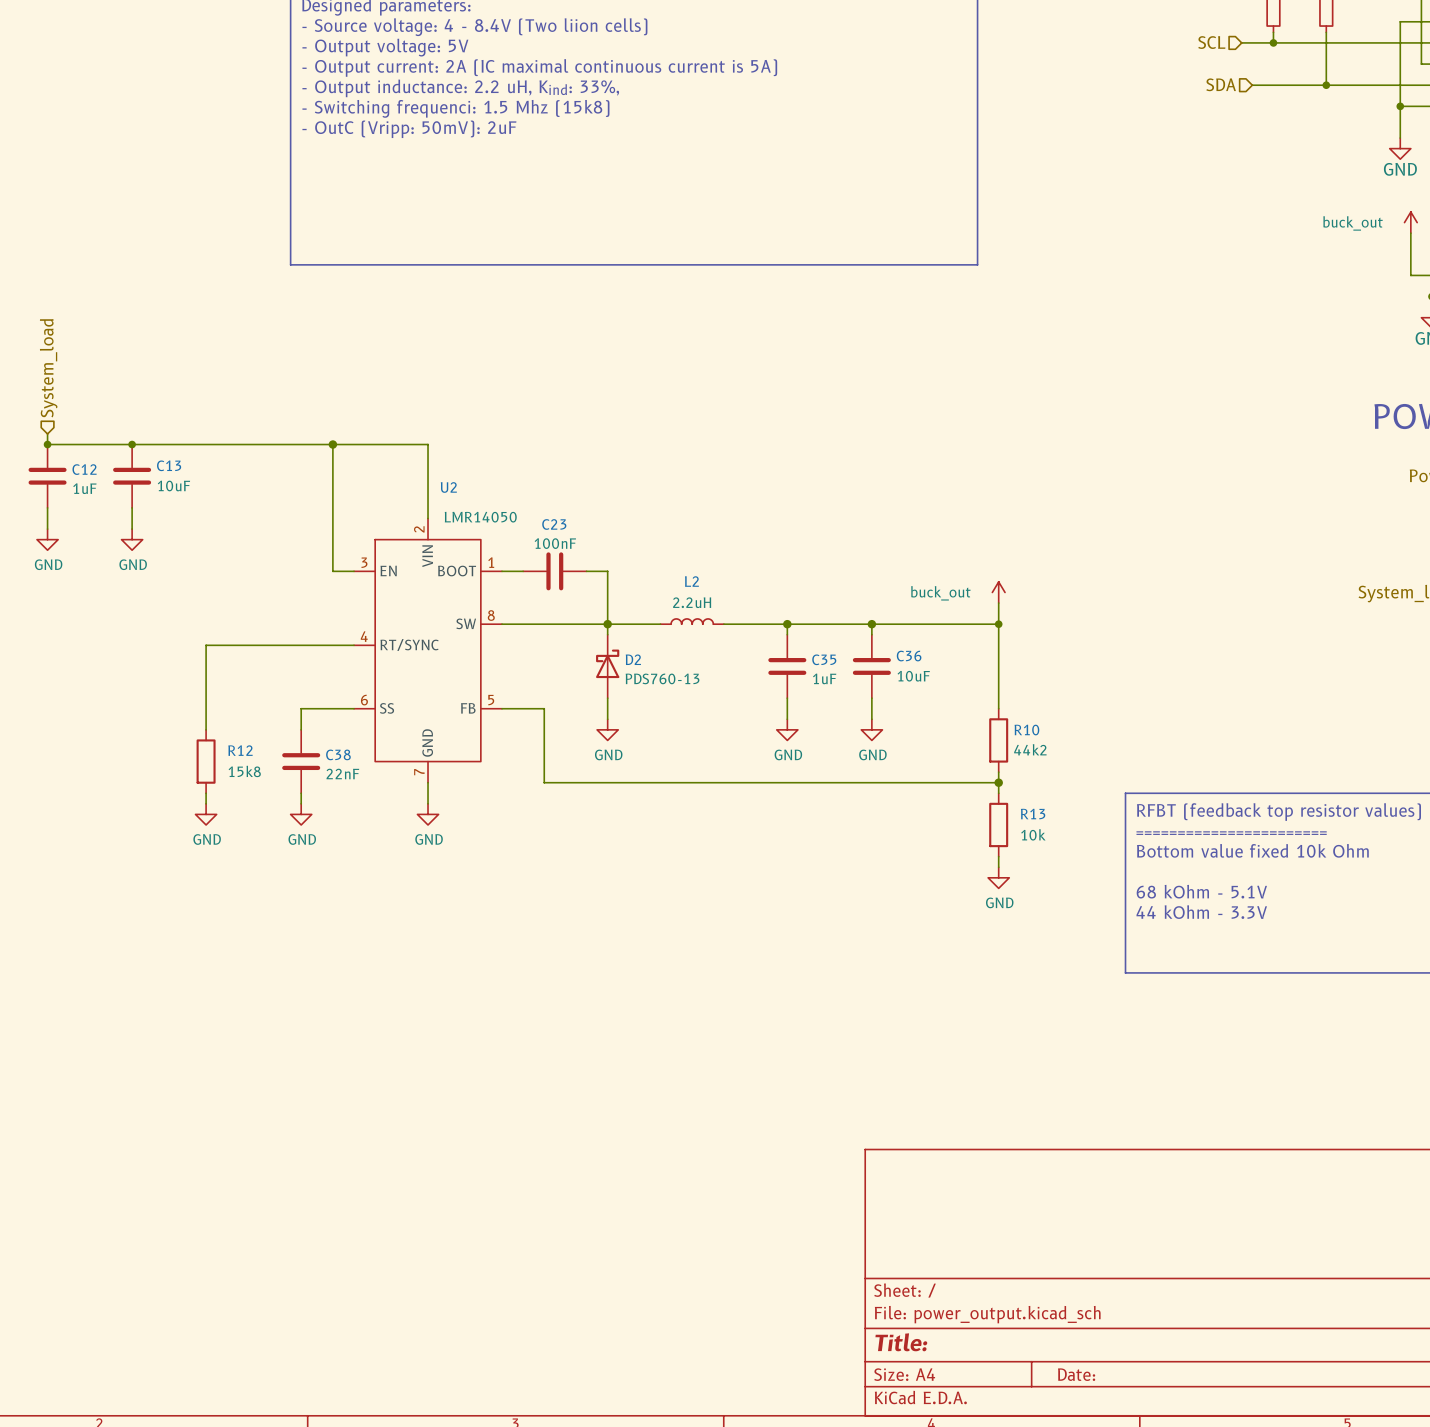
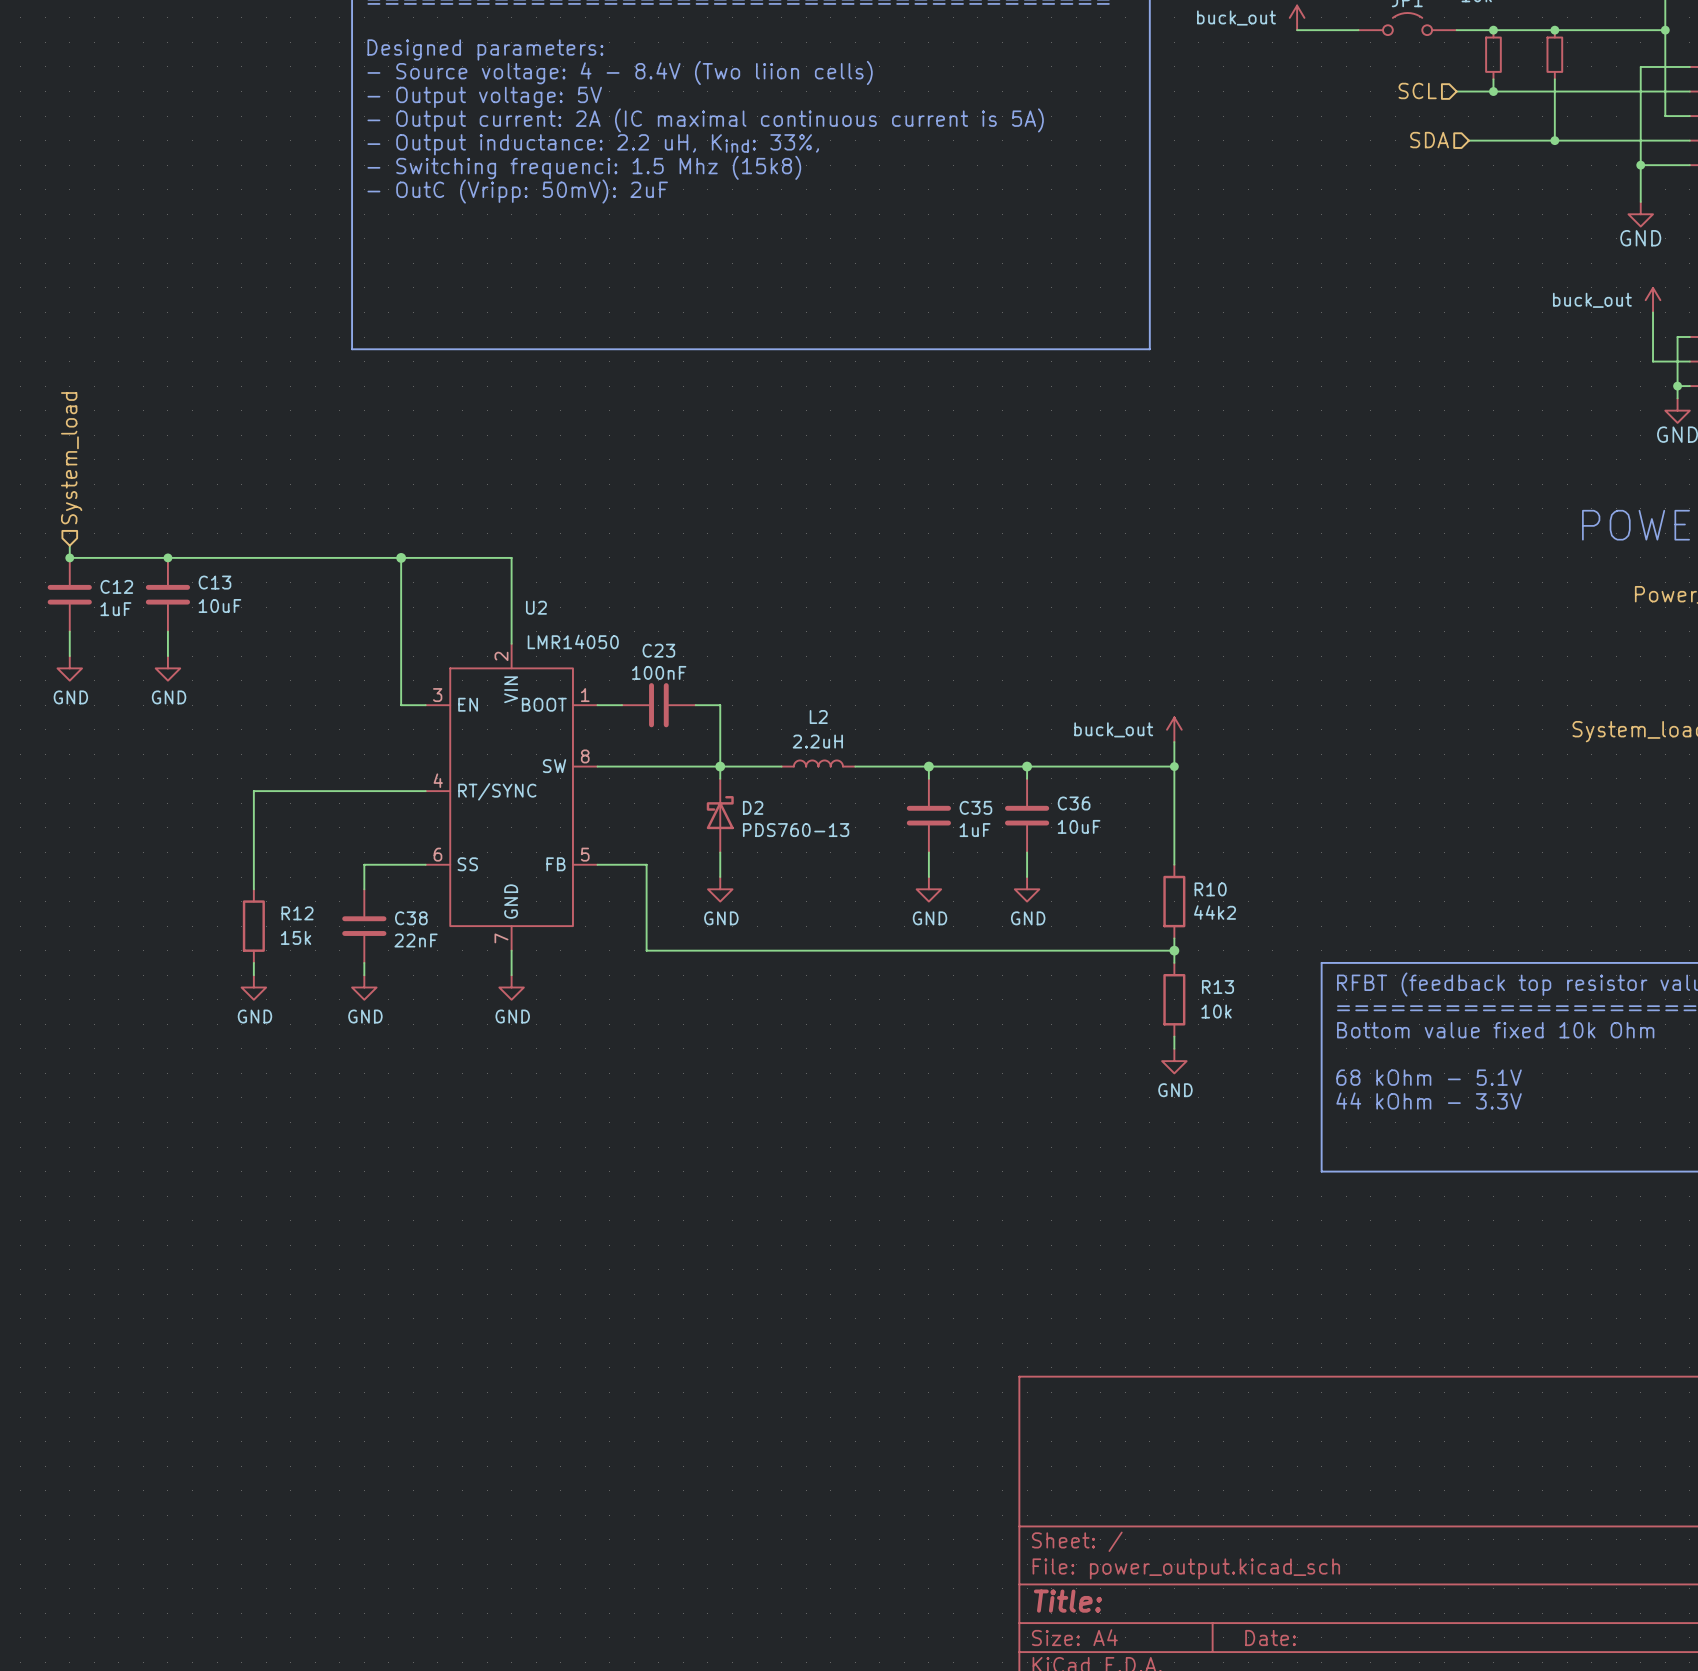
R12 value: 15k8 (244, 771) -> 15k (296, 937)

